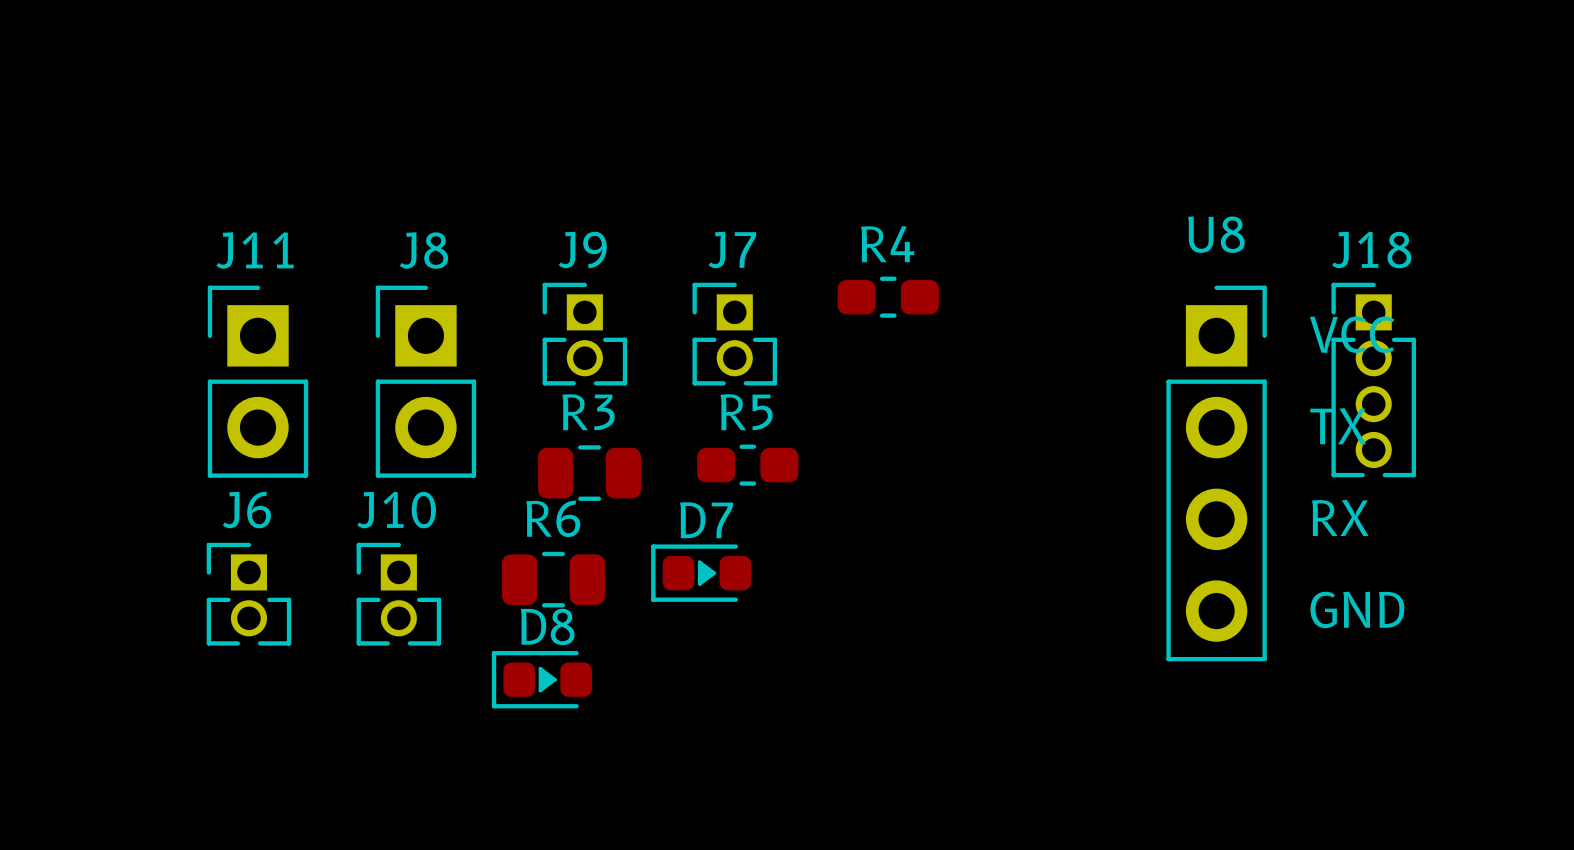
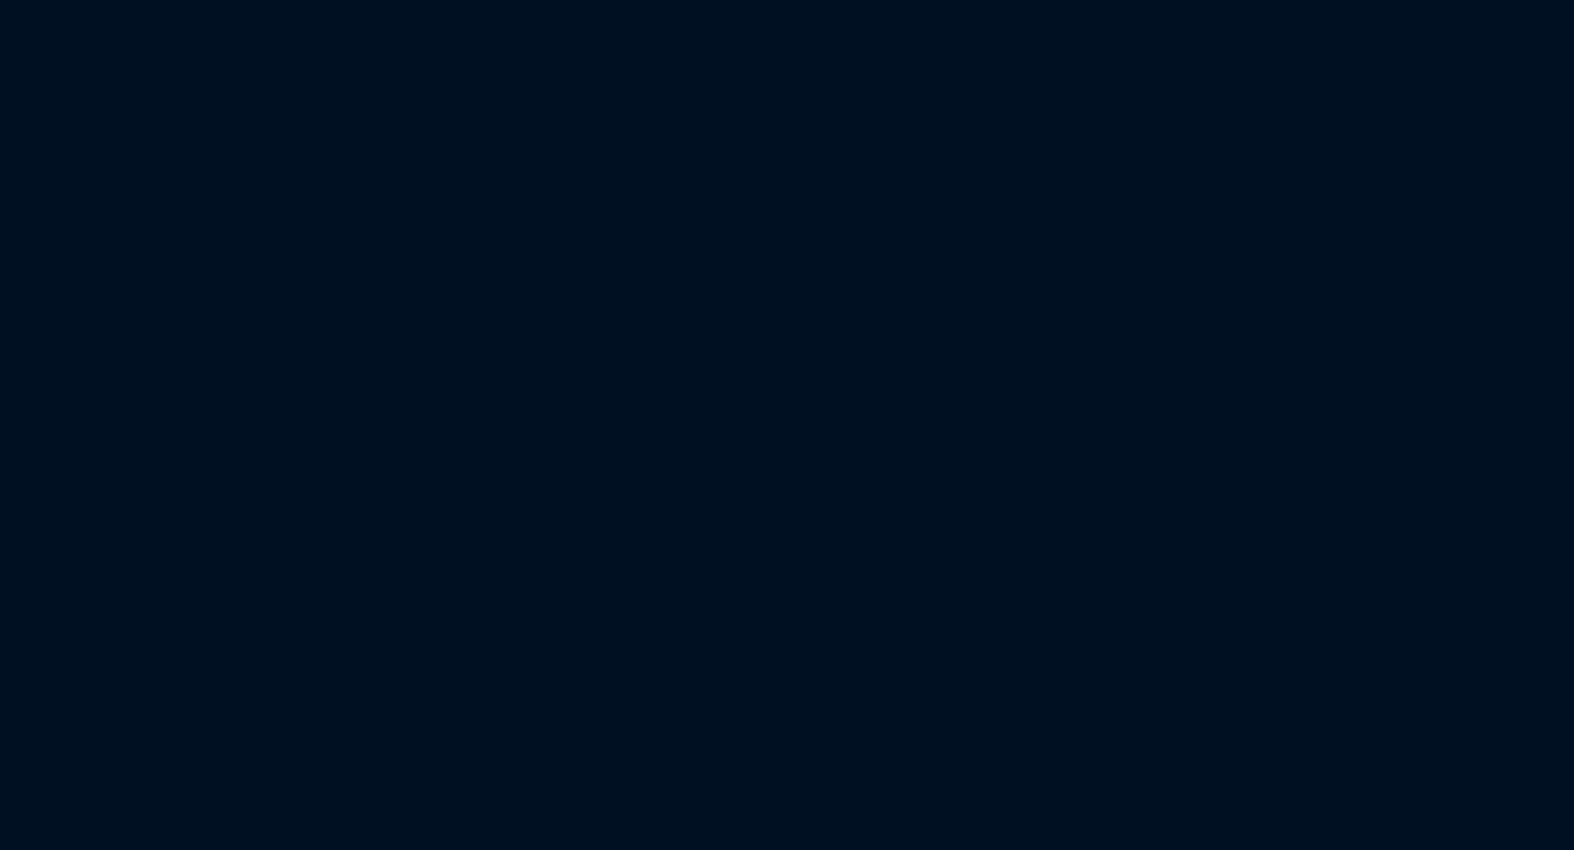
R4: (888, 297) -> none
J9: (584, 334) -> none
J7: (734, 334) -> none
J18: (1373, 379) -> none
J11: (257, 381) -> none
J8: (425, 381) -> none
R5: (747, 465) -> none
R3: (589, 473) -> none
U8: (1216, 473) -> none
D7: (701, 573) -> none
R6: (553, 579) -> none
J6: (248, 594) -> none
J10: (398, 594) -> none
D8: (541, 679) -> none

